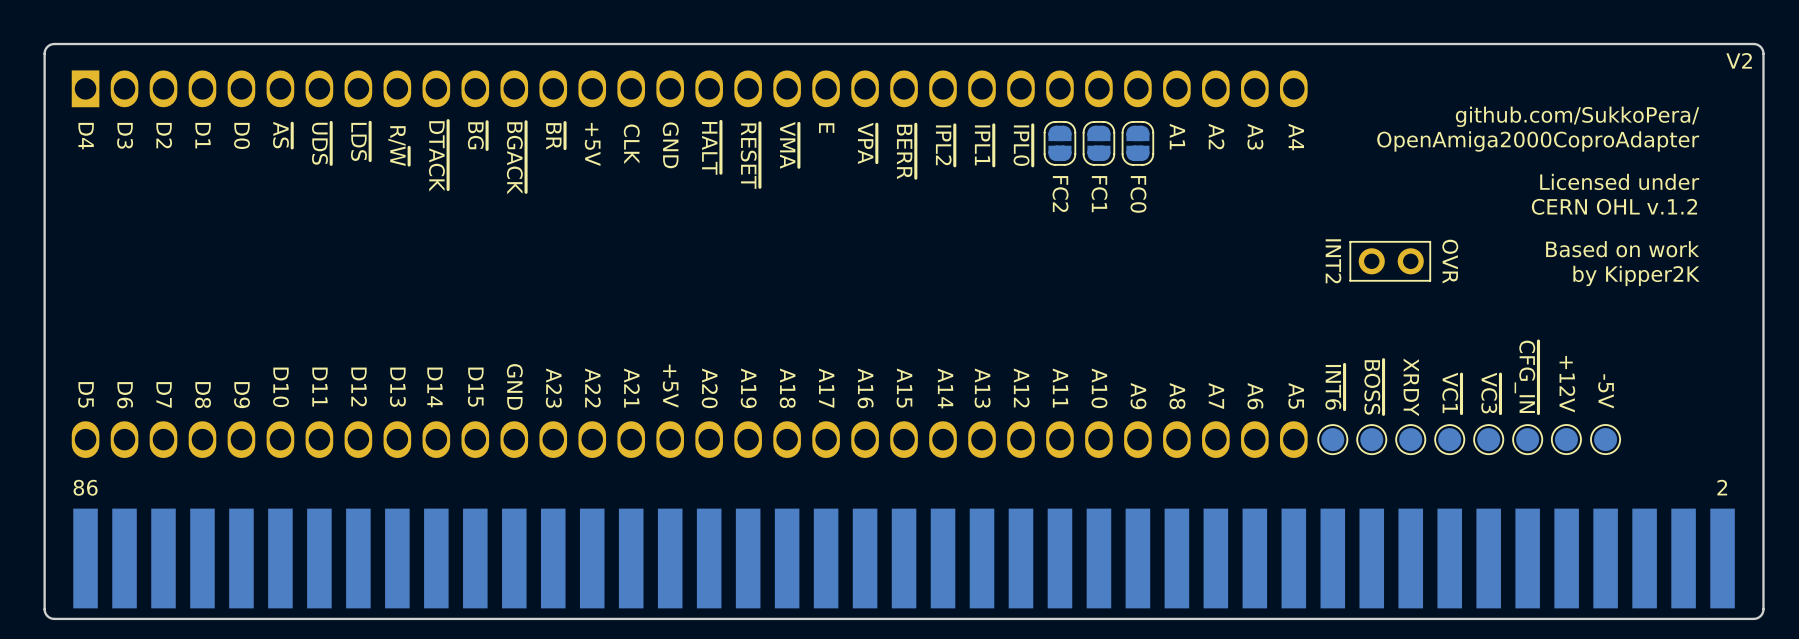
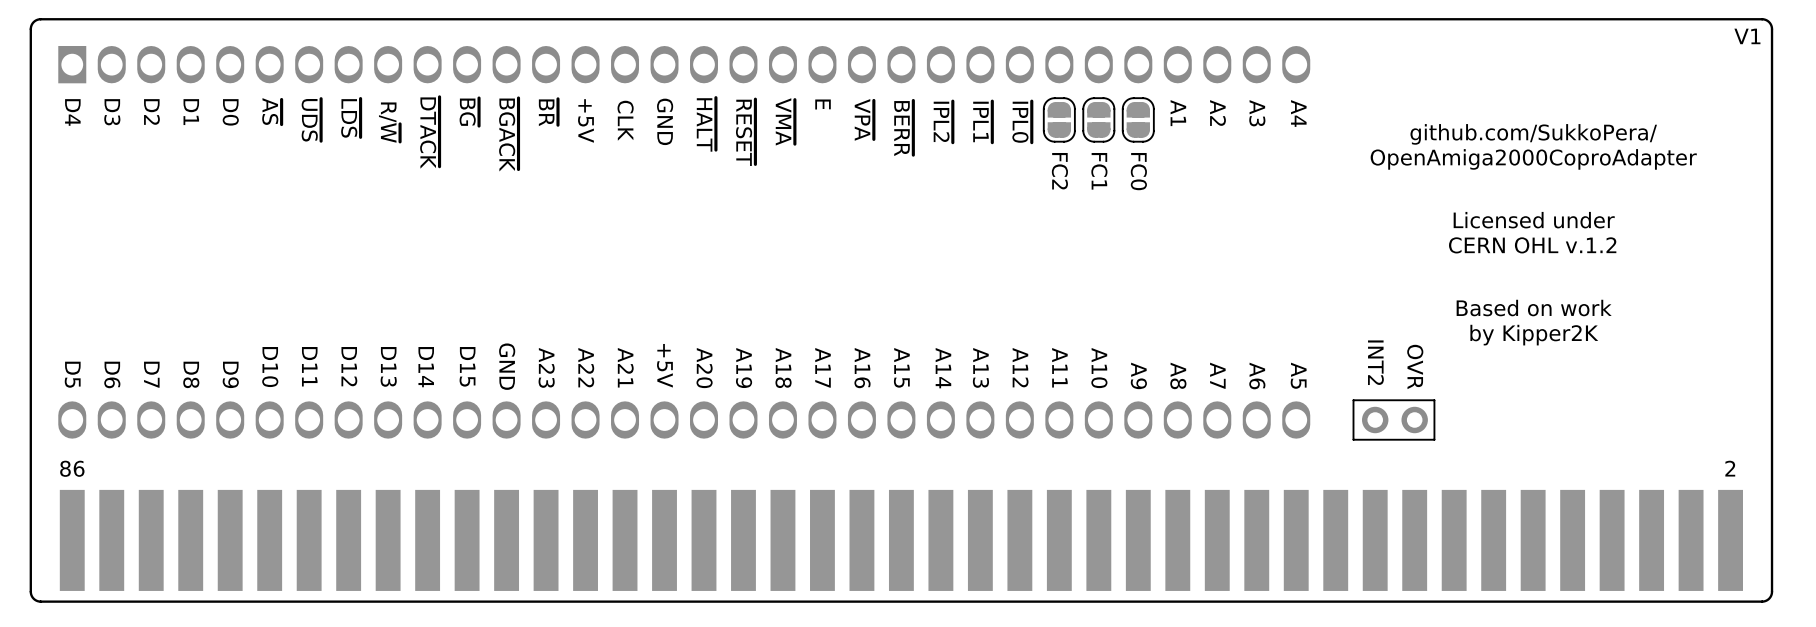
text: V2 (1739, 60) -> V1 (1747, 36)
text position: github.com/SukkoPera/ (1577, 116) -> github.com/SukkoPera/ (1533, 134)
text position: OpenAmiga2000CoproAdapter (1538, 141) -> OpenAmiga2000CoproAdapter (1533, 159)
text position: Licensed under (1619, 181) -> Licensed under (1534, 220)
text position: CERN OHL v.1.2 (1614, 206) -> CERN OHL v.1.2 (1532, 245)
text position: Based on work (1622, 249) -> Based on work (1534, 308)
text position: INT2 (1333, 261) -> INT2 (1375, 362)
part position: (1390, 261) -> (1393, 420)
text: OVR (1450, 261) -> none
text position: by Kipper2K (1636, 275) -> by Kipper2K (1534, 335)
text: ~{CFG_IN} (1526, 377) -> none
text: +12V (1567, 384) -> none
text: ~{INT6} (1334, 387) -> none
text: ~{BOSS} (1373, 387) -> none
text: XRDY (1411, 387) -> OVR (1415, 366)
text: -5V (1606, 391) -> none
text: ~{VC1} (1451, 393) -> none
text: ~{VC3} (1490, 393) -> none
part: (1332, 439) -> none
part: (1371, 439) -> none
part: (1410, 439) -> none
part: (1449, 439) -> none
part: (1488, 439) -> none
part: (1527, 439) -> none
part: (1566, 439) -> none
part: (1605, 439) -> none

